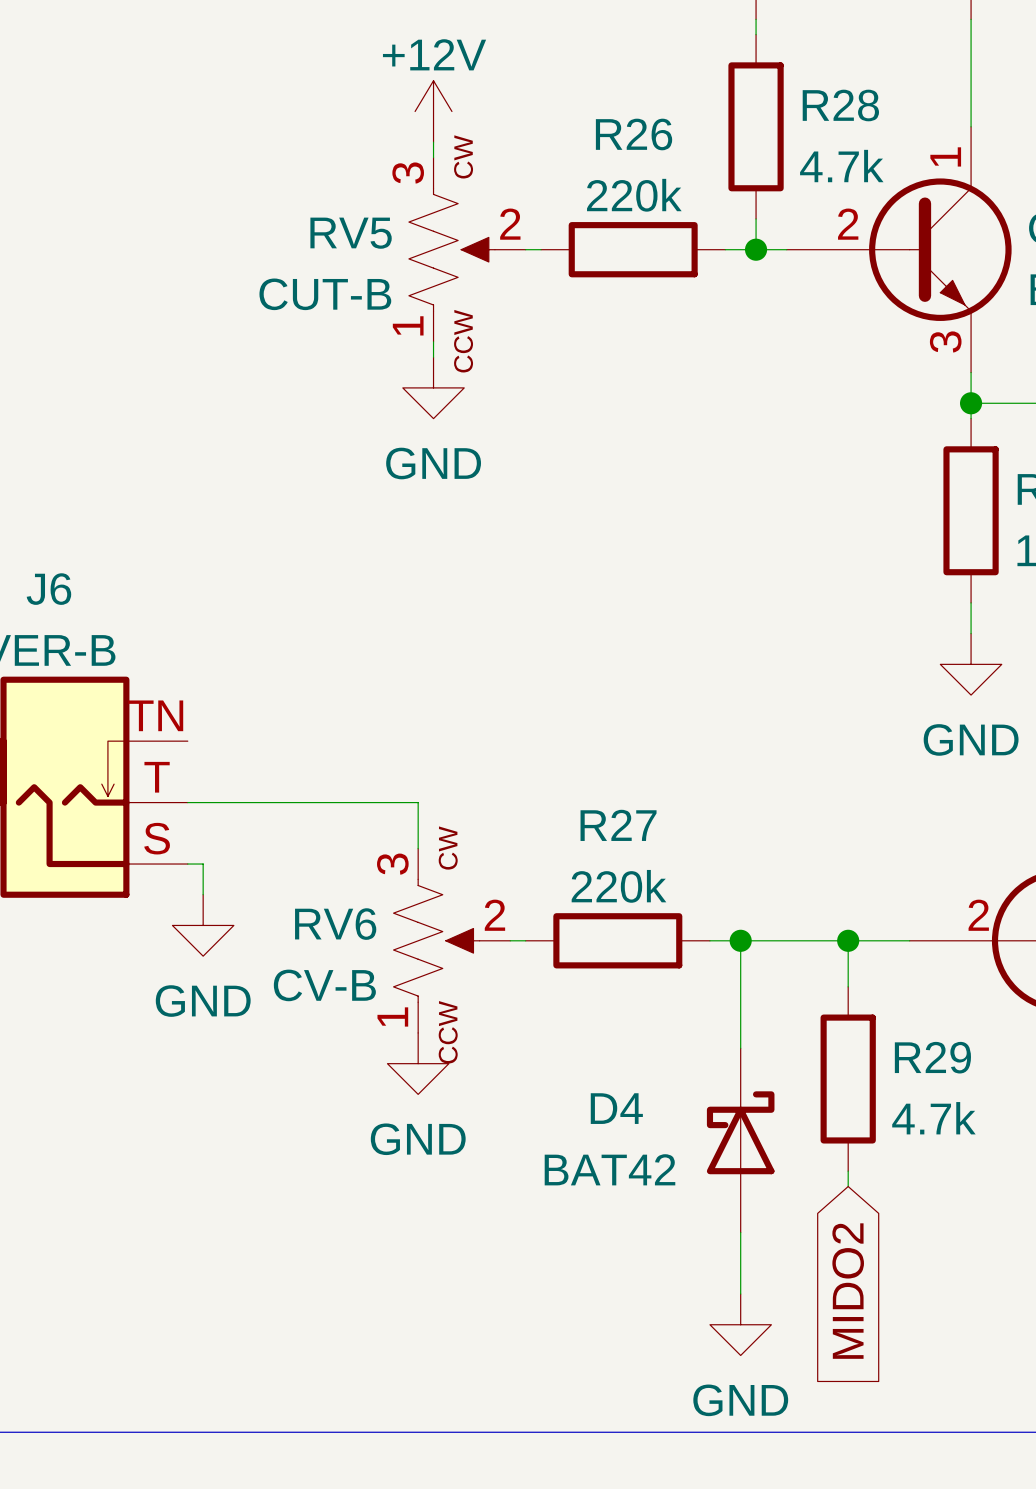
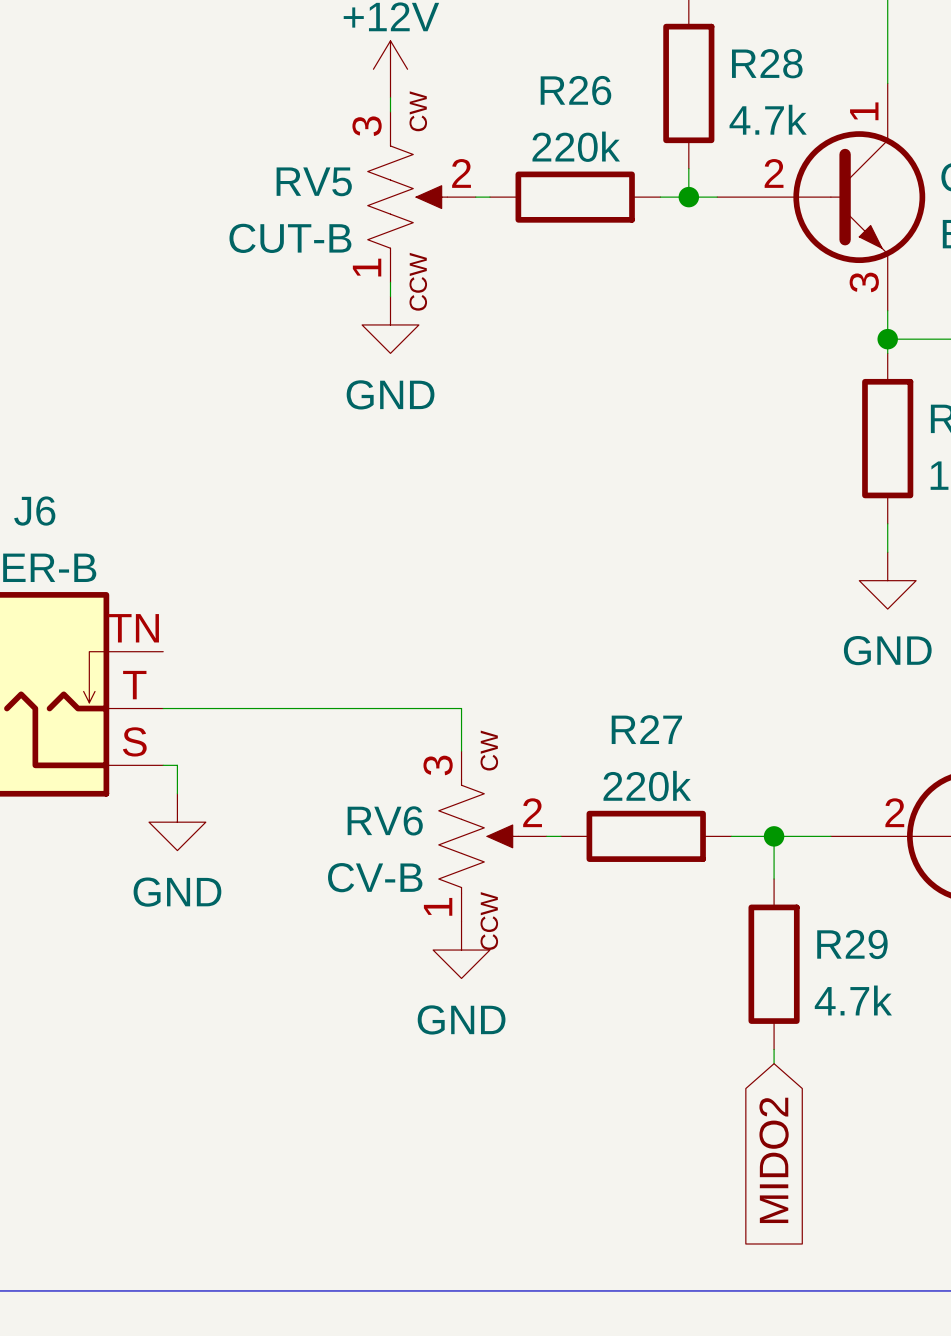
wire: (418, 802) (418, 848) -> (376, 708) (461, 708) (461, 751)
RV6 position: (451, 940) -> (492, 836)
wire: (510, 940) (525, 940) -> (546, 836) (560, 836)
R27 position: (617, 940) -> (646, 836)
wire: (709, 940) (802, 940) -> none
wire: (740, 940) (740, 1048) -> none
junction: (740, 940) -> none
power symbol position: GND (418, 1063) -> GND (461, 950)
D4: BAT42 (740, 1140) -> none
wire: (740, 1232) (740, 1294) -> none
power symbol: GND (740, 1324) -> none

